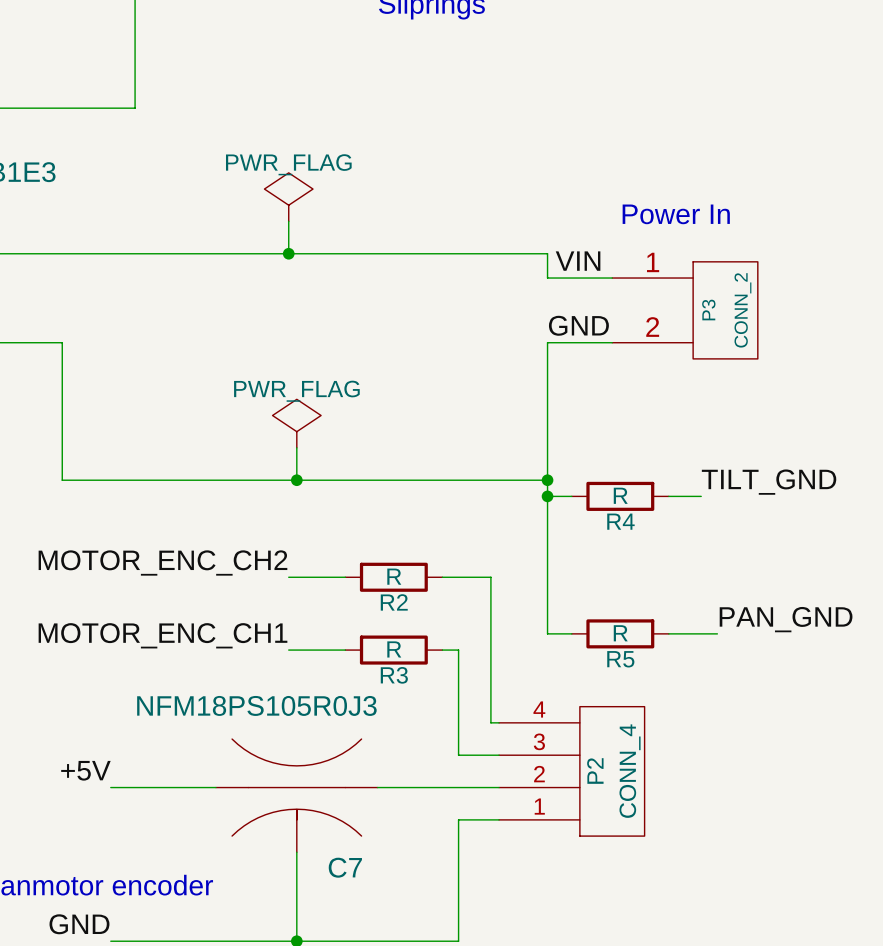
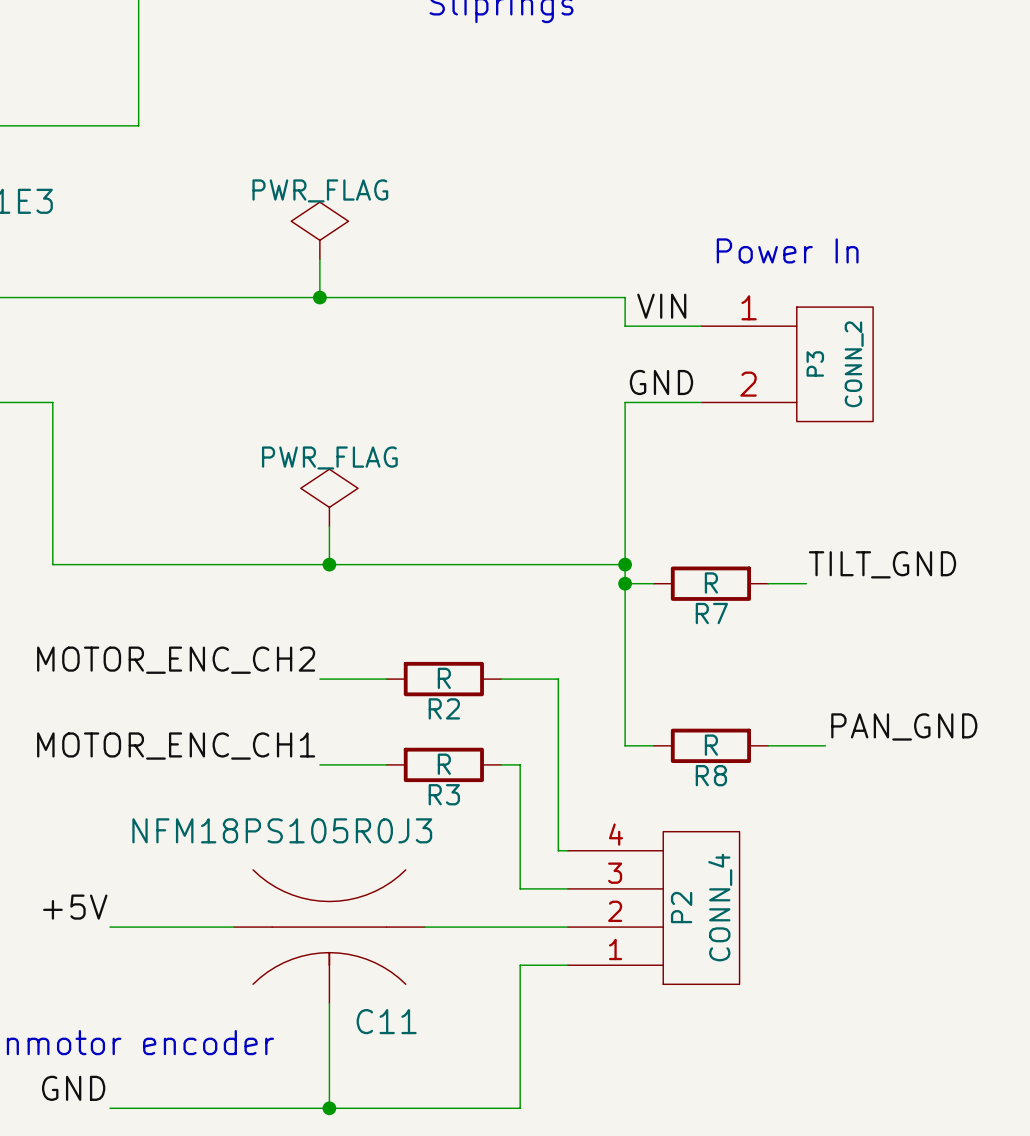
R4 name: R4 (620, 521) -> R7 (711, 613)
R5 name: R5 (620, 659) -> R8 (711, 775)
C7 name: C7 (345, 867) -> C11 (386, 1021)

